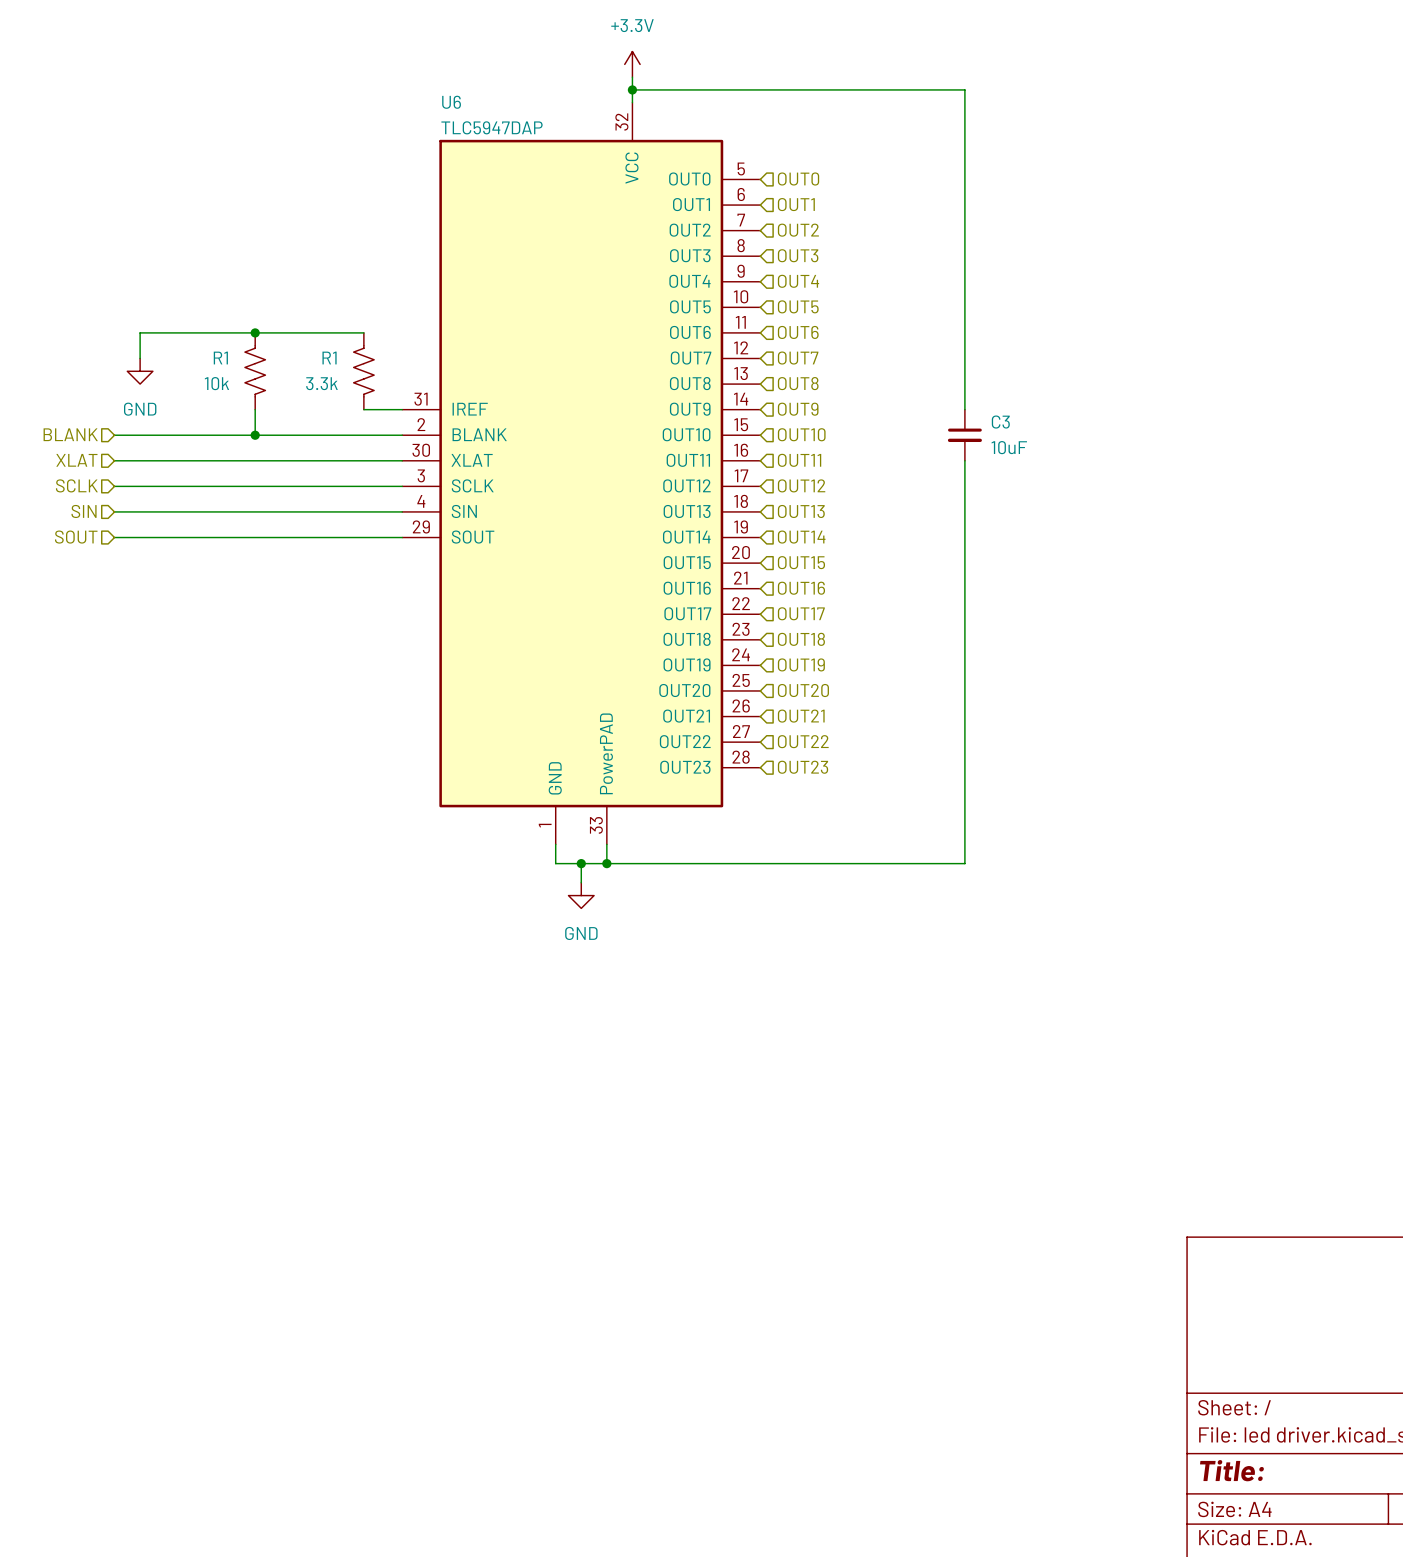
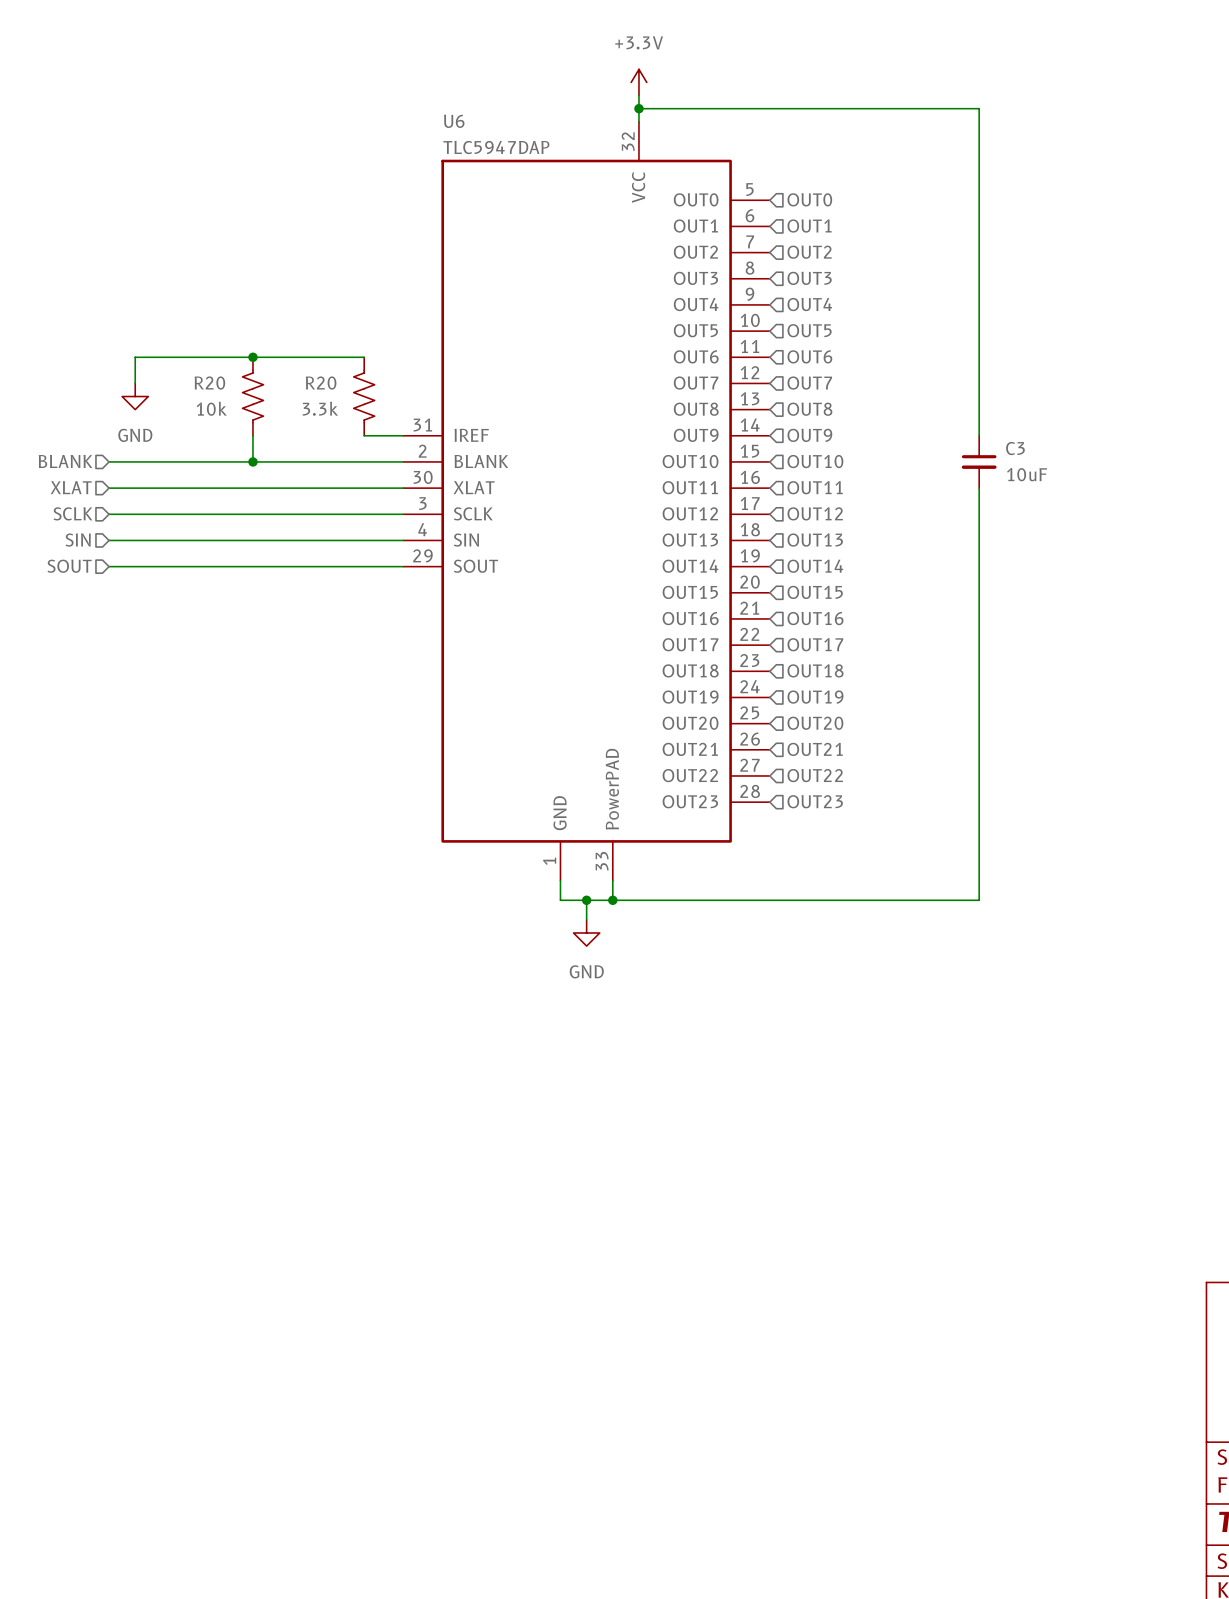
R1 name: R1 (220, 358) -> R20 (209, 383)
R1 name: R1 (329, 358) -> R20 (321, 383)

